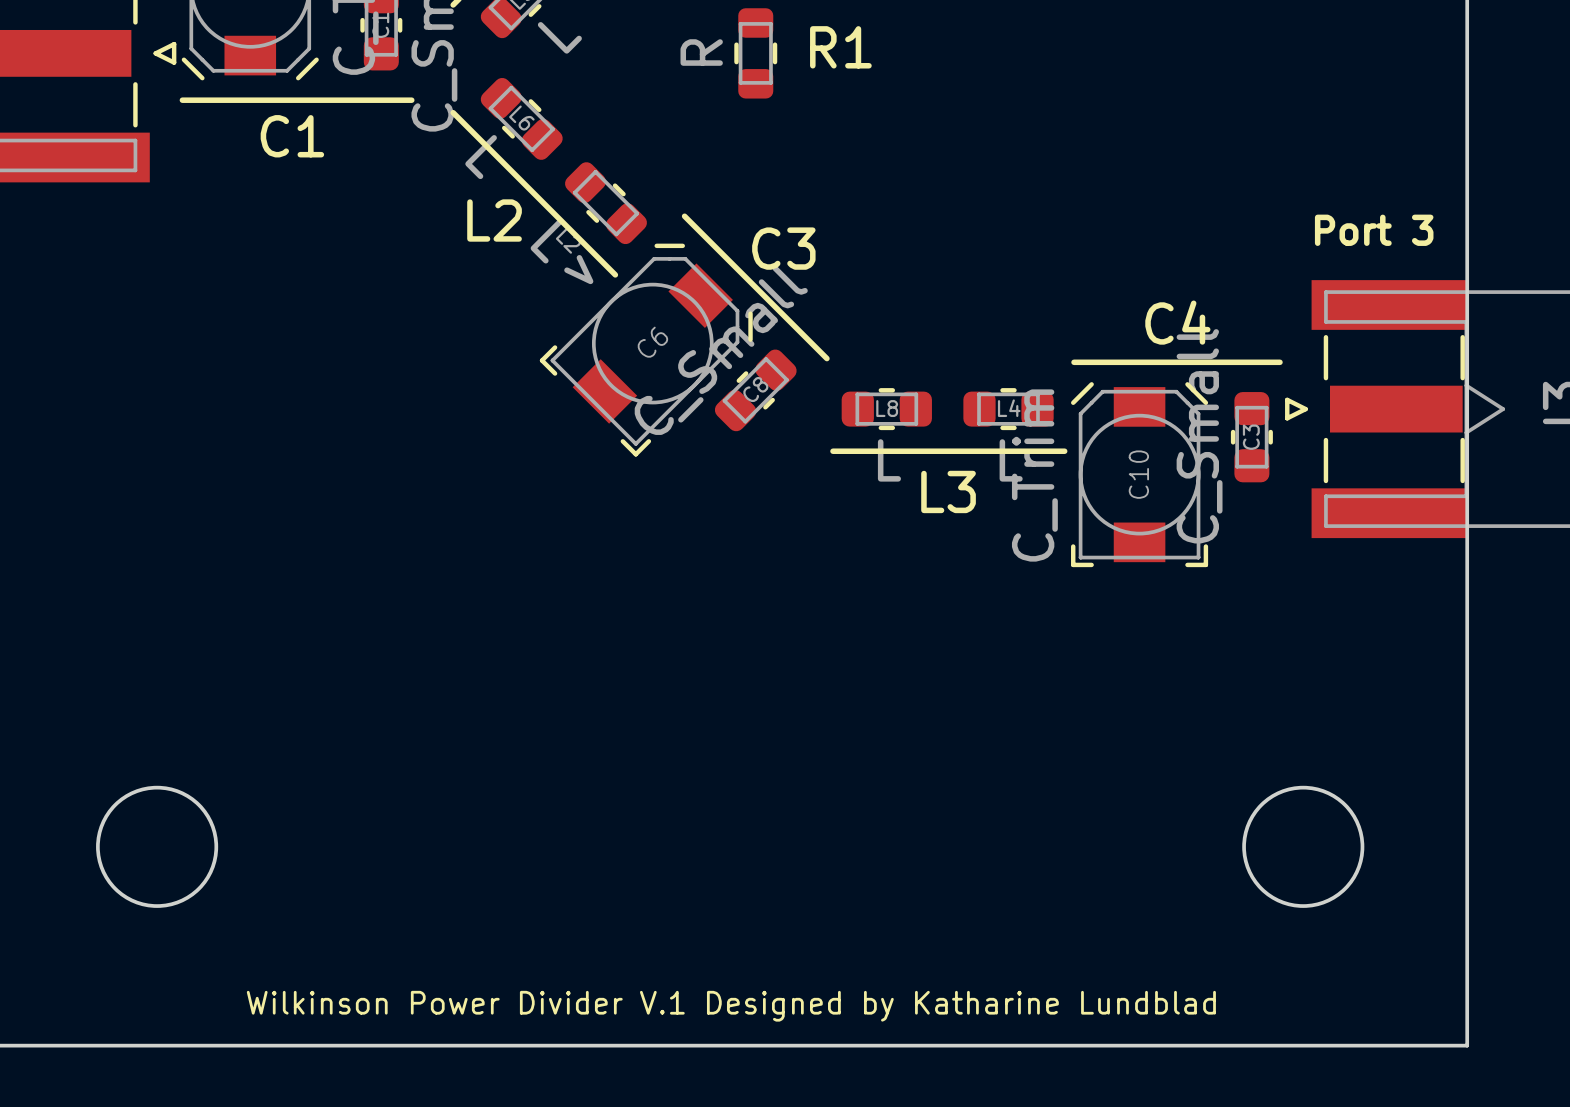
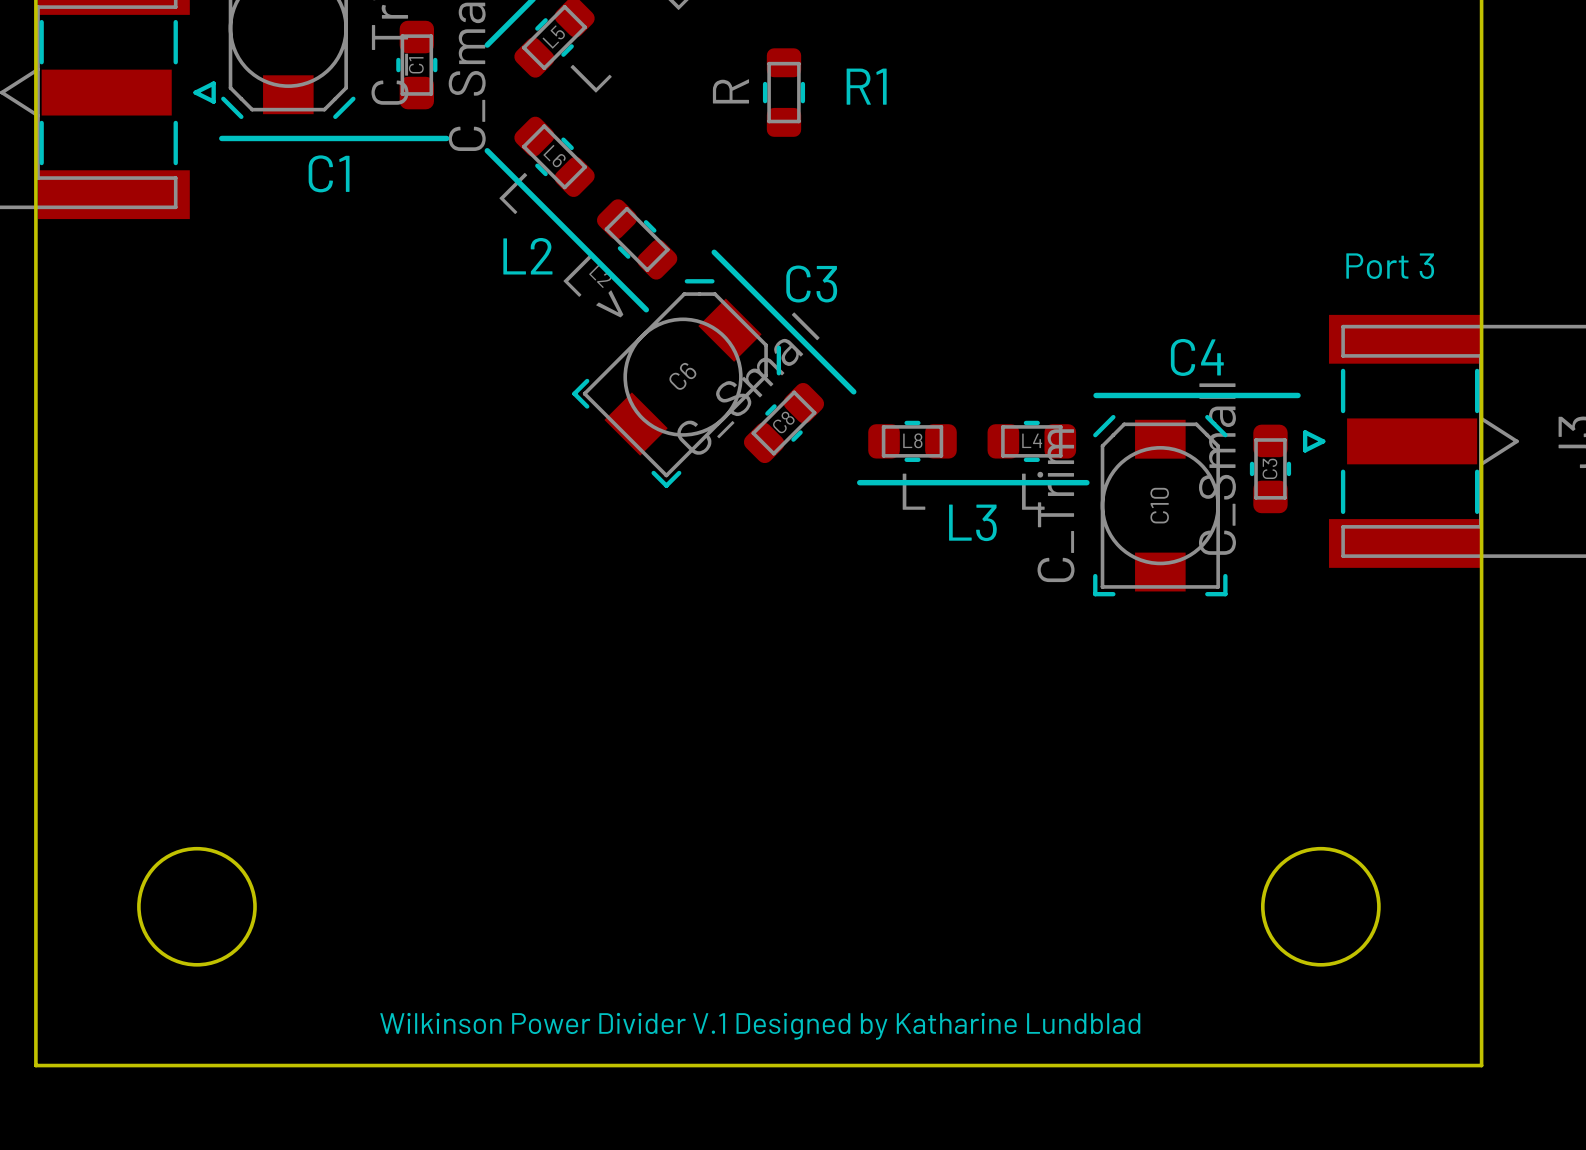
round board edge position: (157, 846) -> (196, 906)
round board edge position: (1303, 846) -> (1320, 906)

